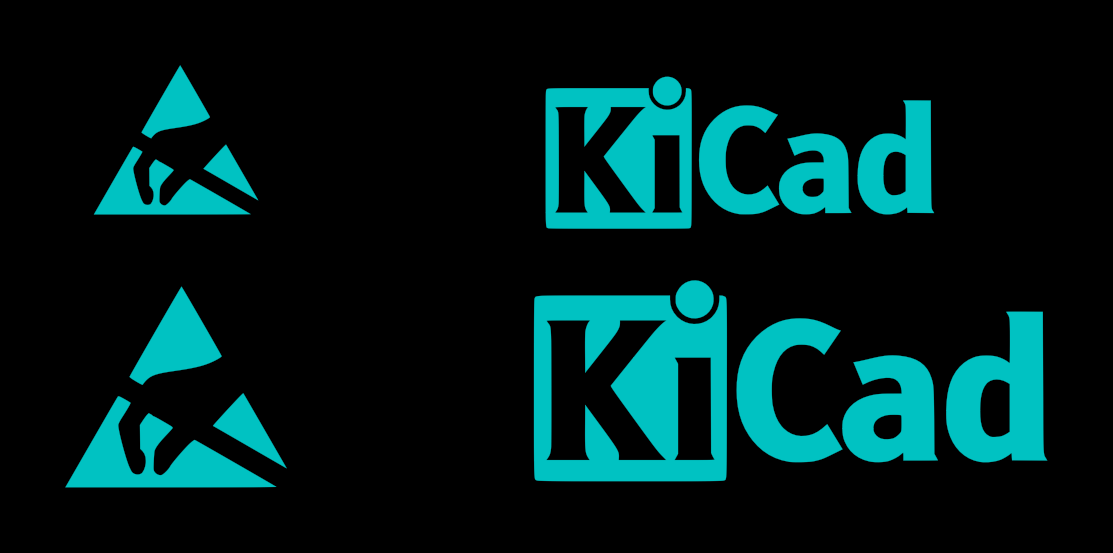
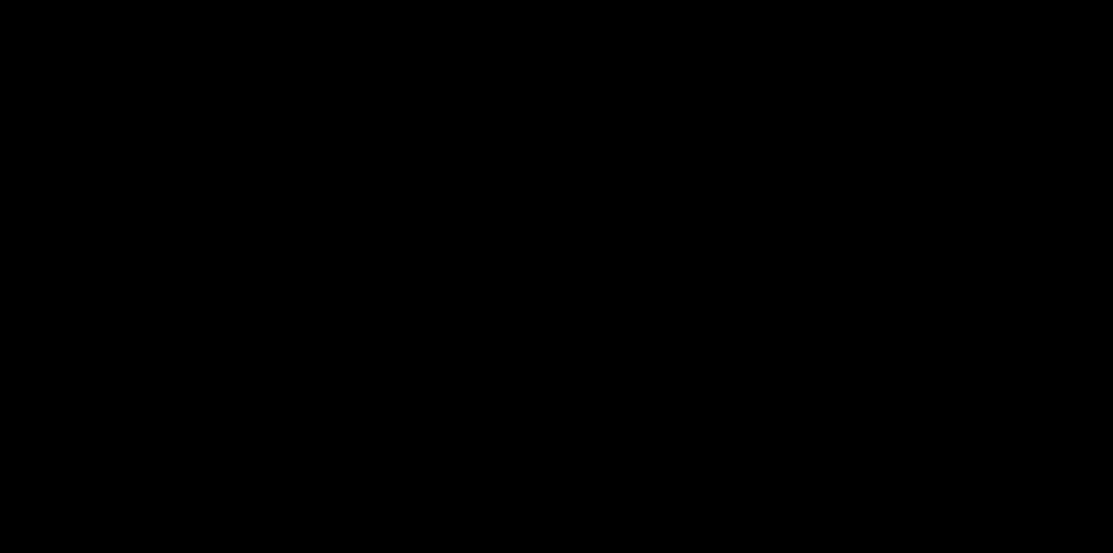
drawing: [93, 65, 259, 215] -> none
drawing: [545, 76, 935, 229] -> none
drawing: [533, 280, 1048, 482] -> none
drawing: [65, 286, 287, 488] -> none

